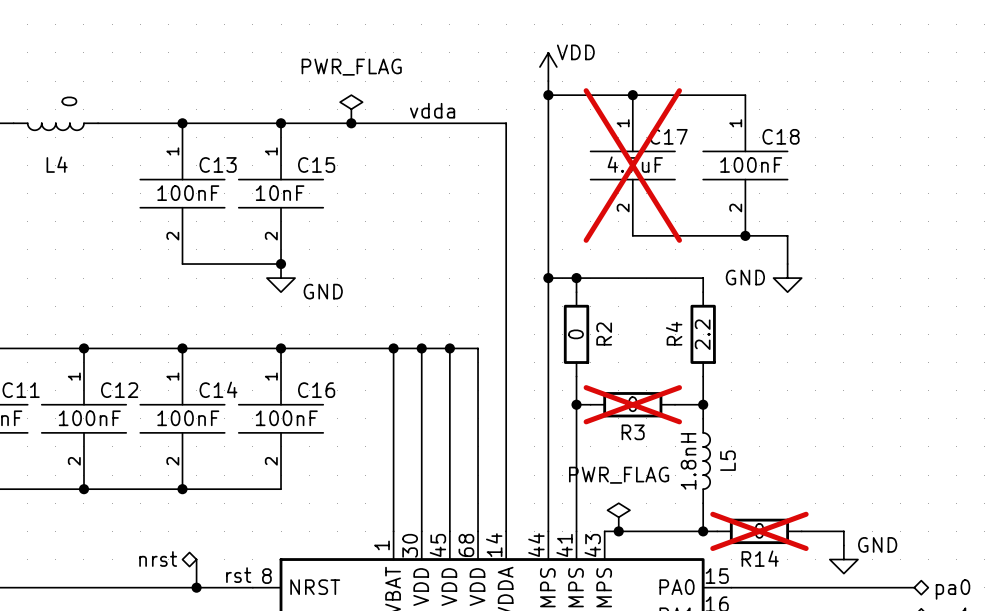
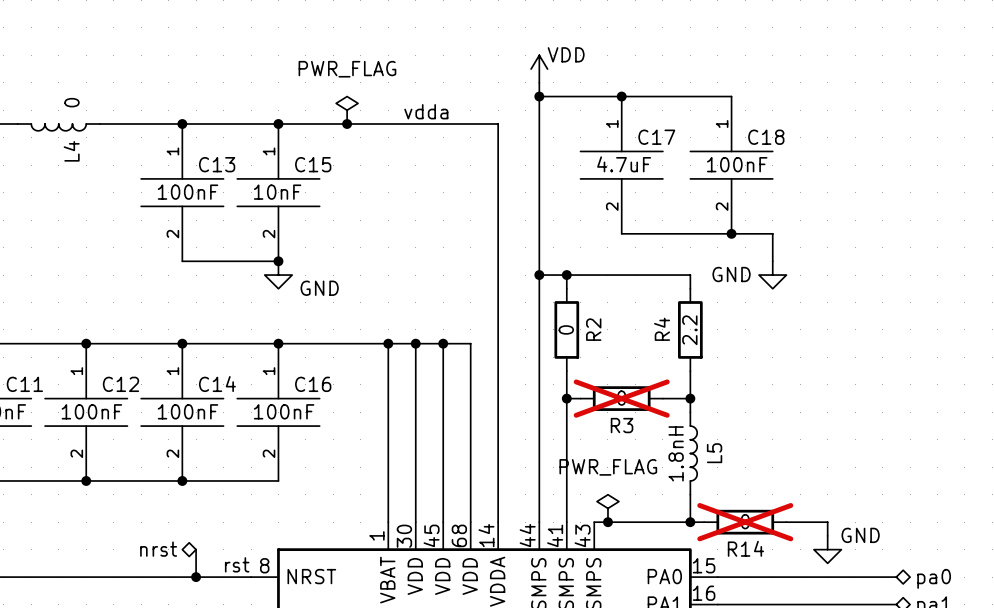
L4 name rotation: 0° (57, 164) -> 90° counterclockwise (71, 151)
C17 do-not-place cross: (632, 165) -> none

